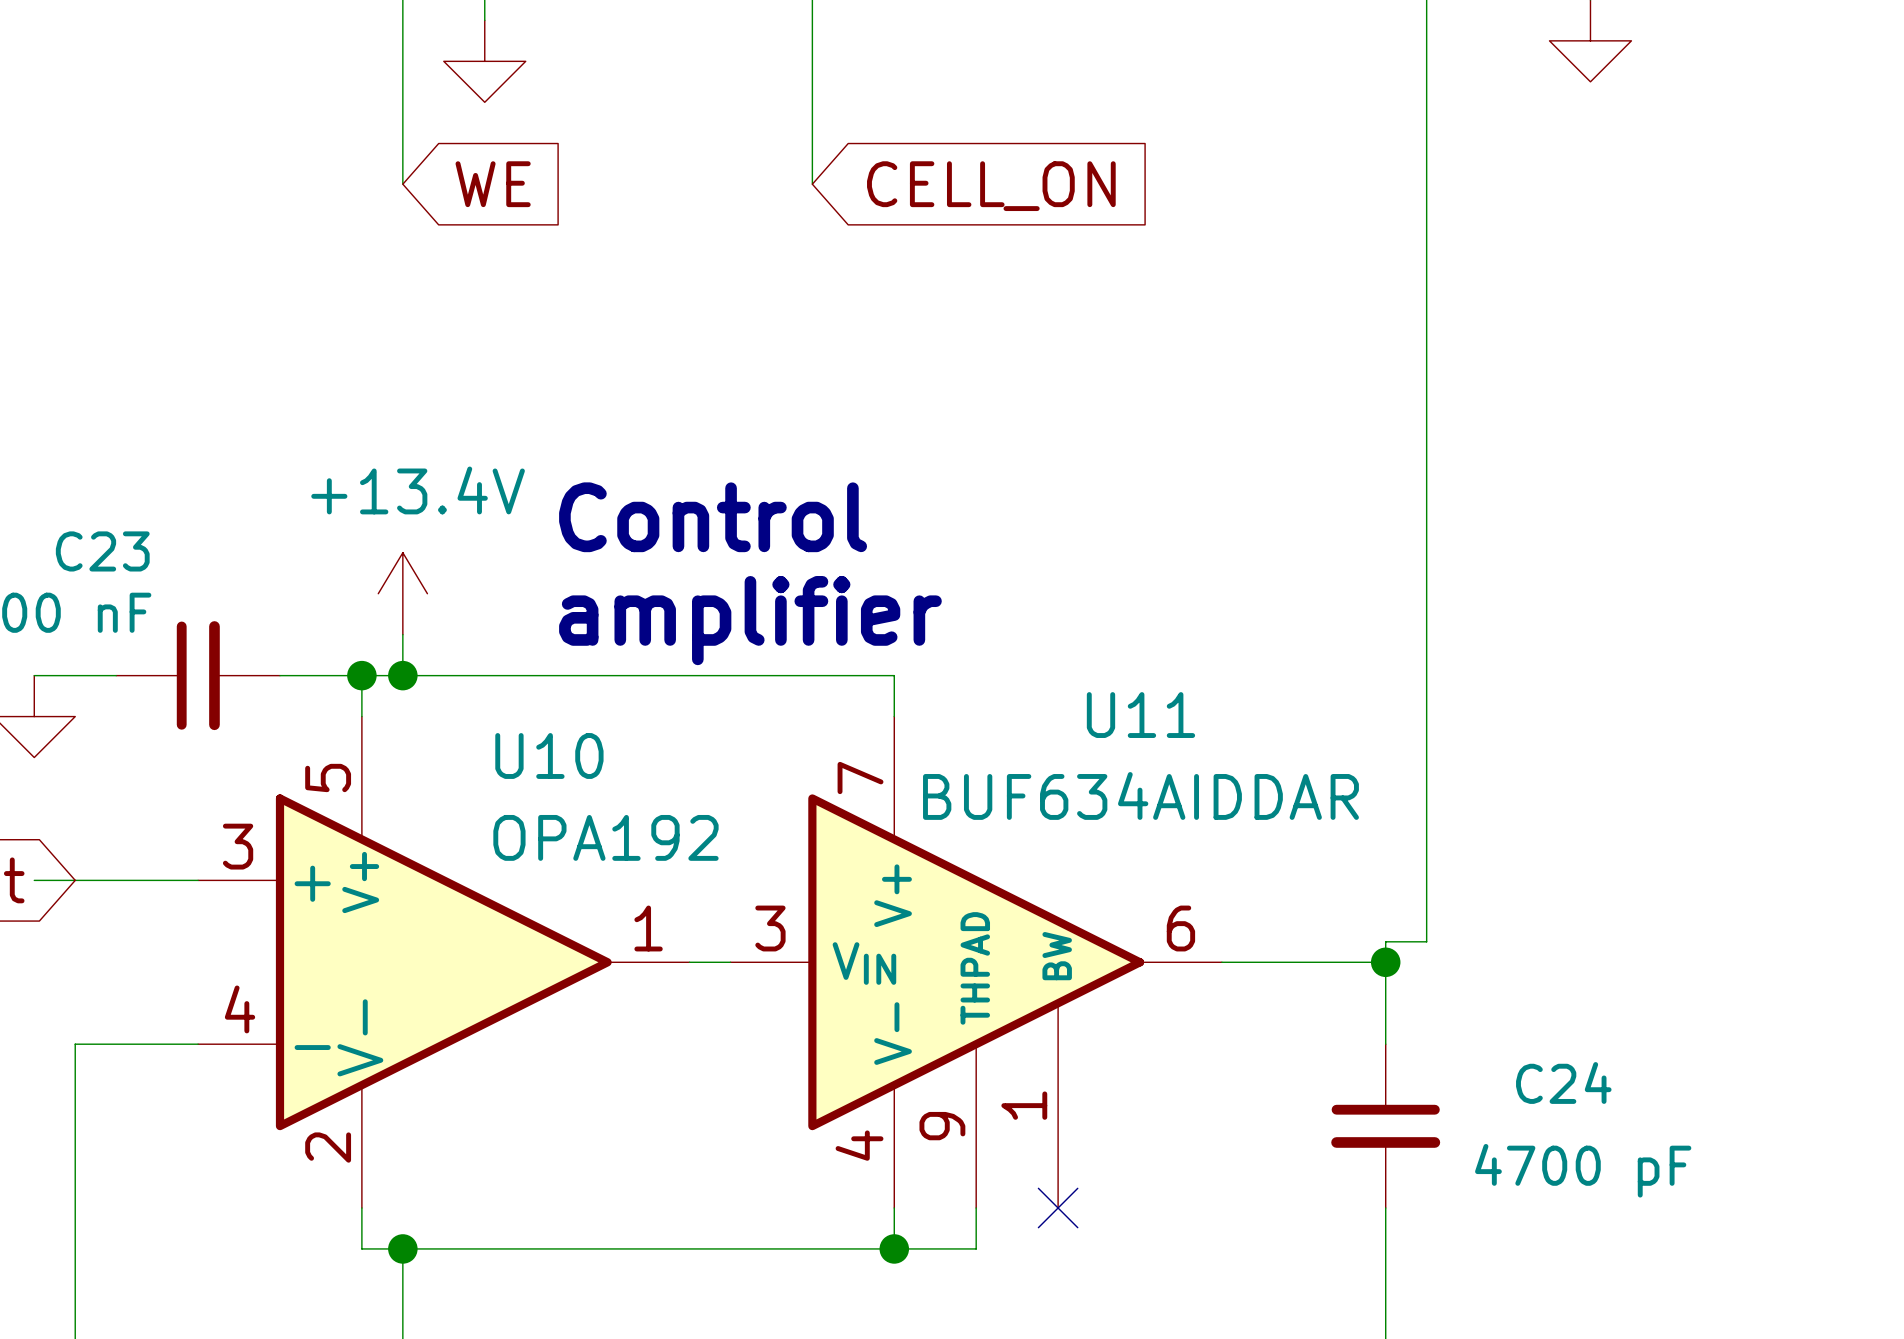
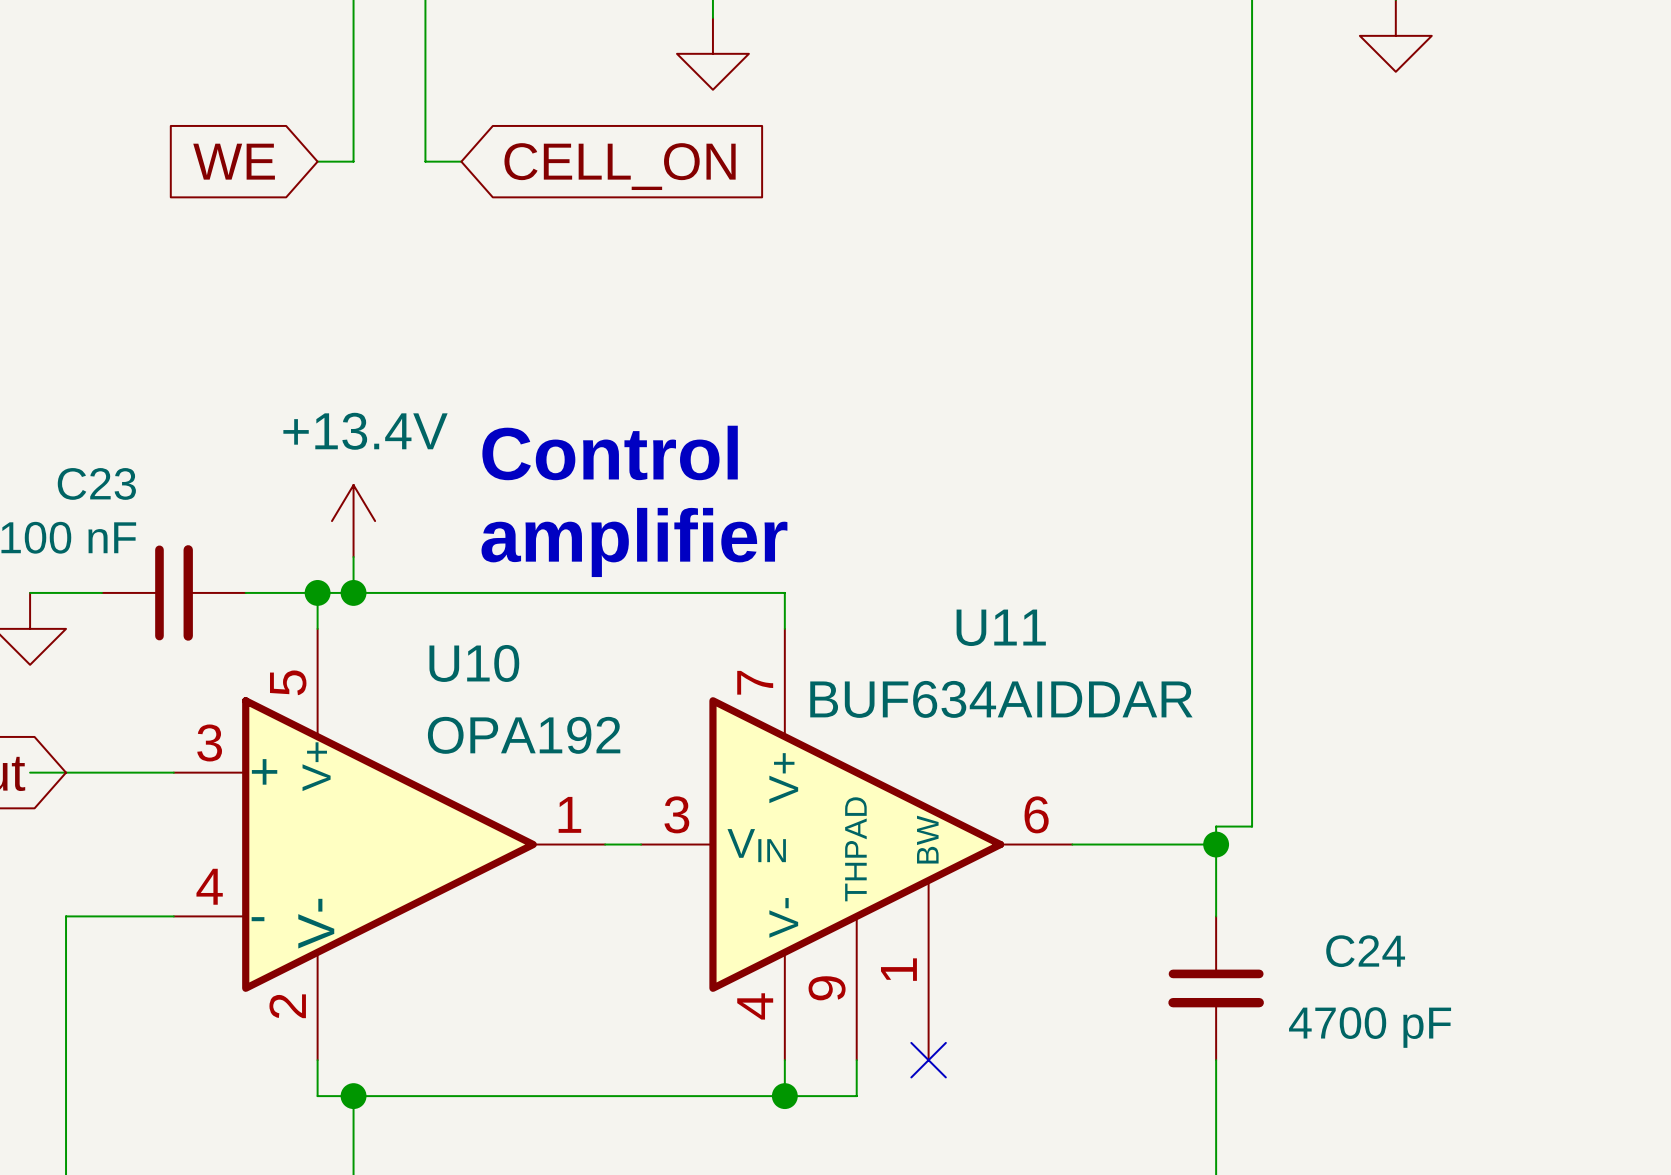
wire: none -> (425, 17) (425, 161) (461, 161)
wire: (812, 20) (812, 184) -> none
power symbol position: (484, 61) -> (712, 53)
wire: none -> (317, 161) (353, 161)
global label rotation: 0° (493, 184) -> 180° (234, 161)
global label position: WE (493, 184) -> WE (234, 161)
global label position: CELL_ON (991, 186) -> CELL_ON (620, 166)

